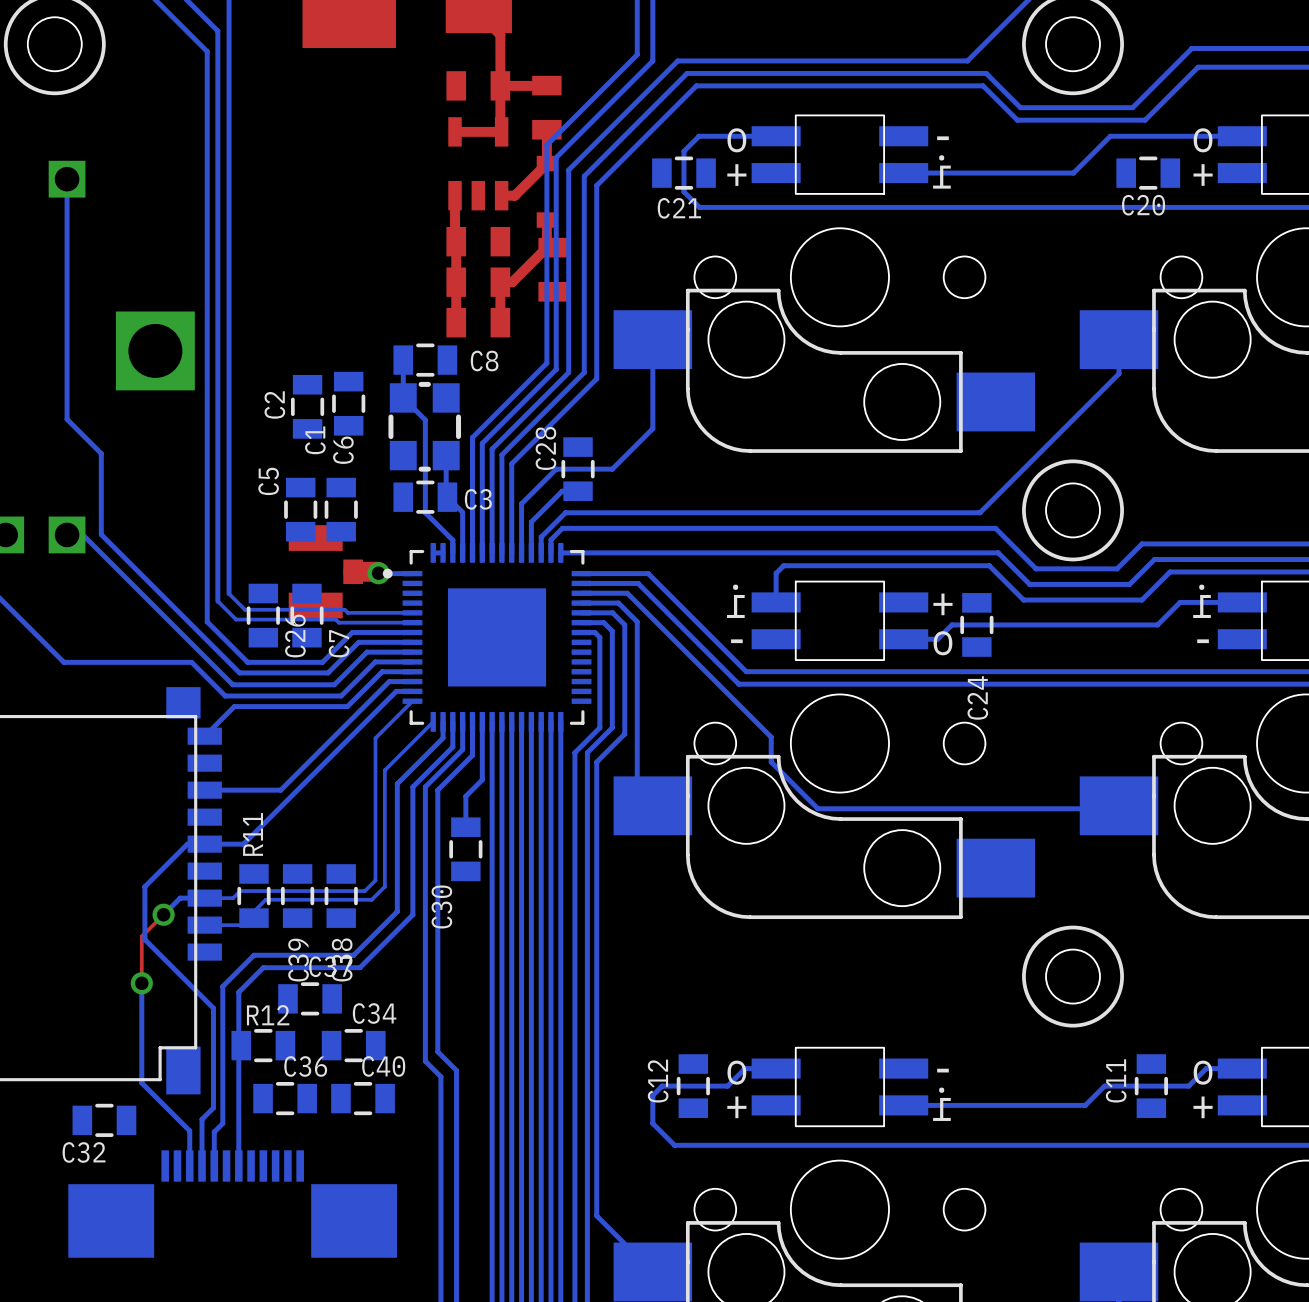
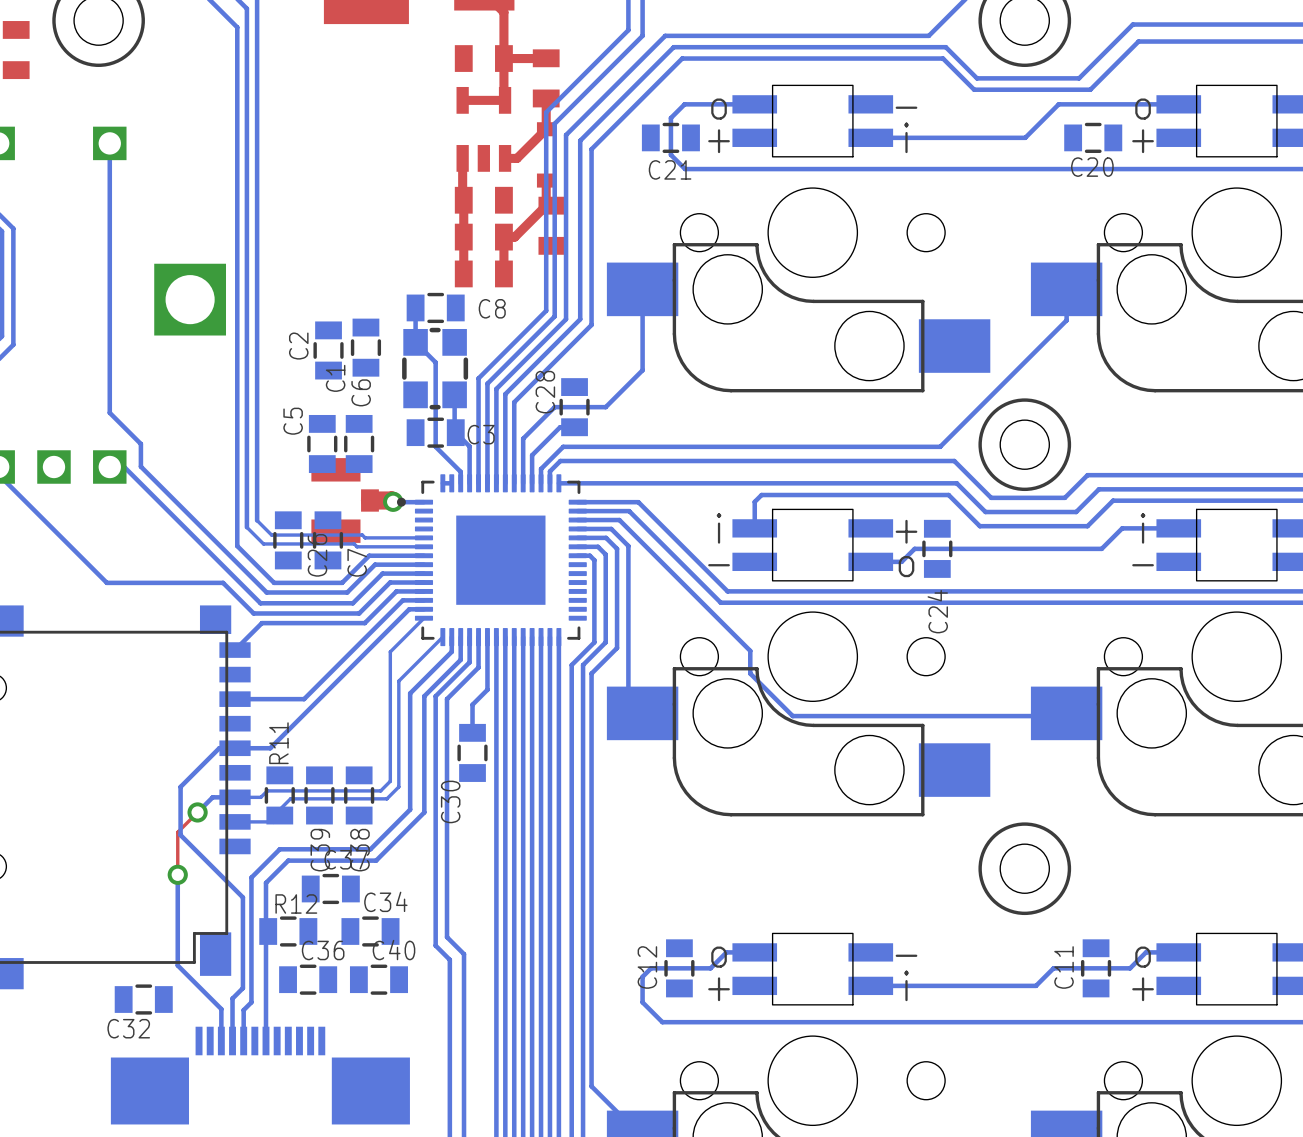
bottom track: (67, 419) (101, 453) (101, 509) -> (109, 361) (109, 412) (140, 443)

